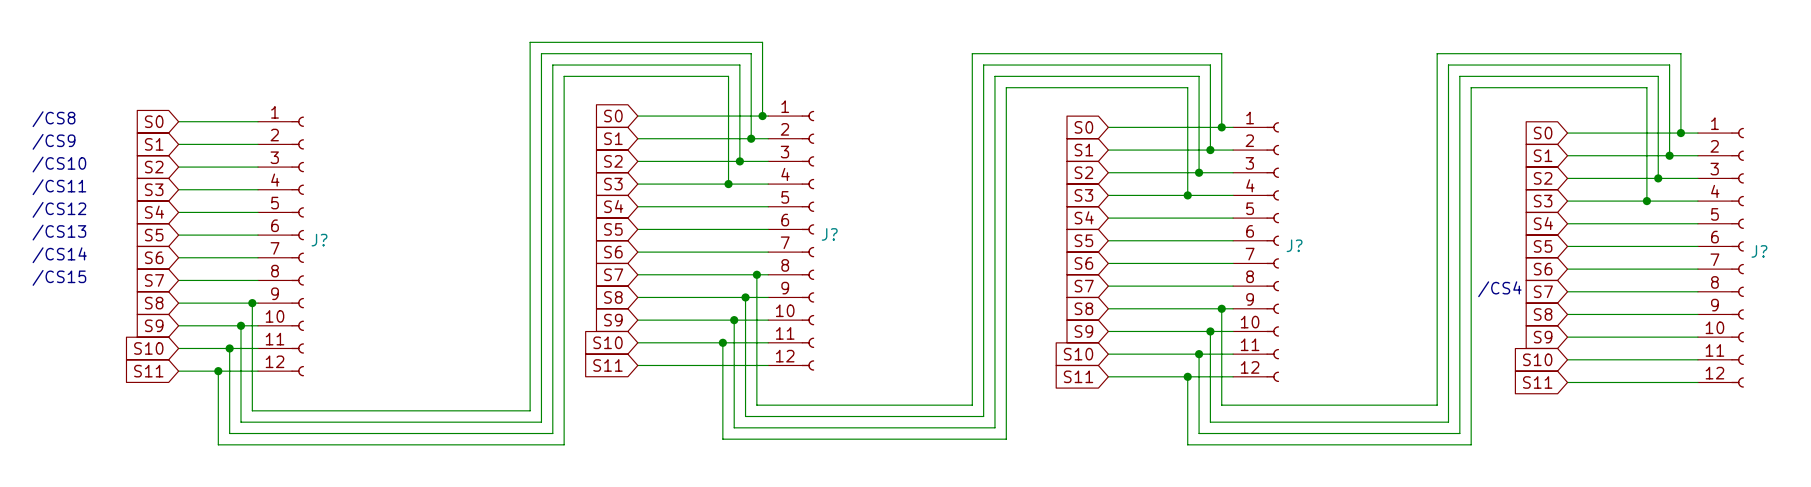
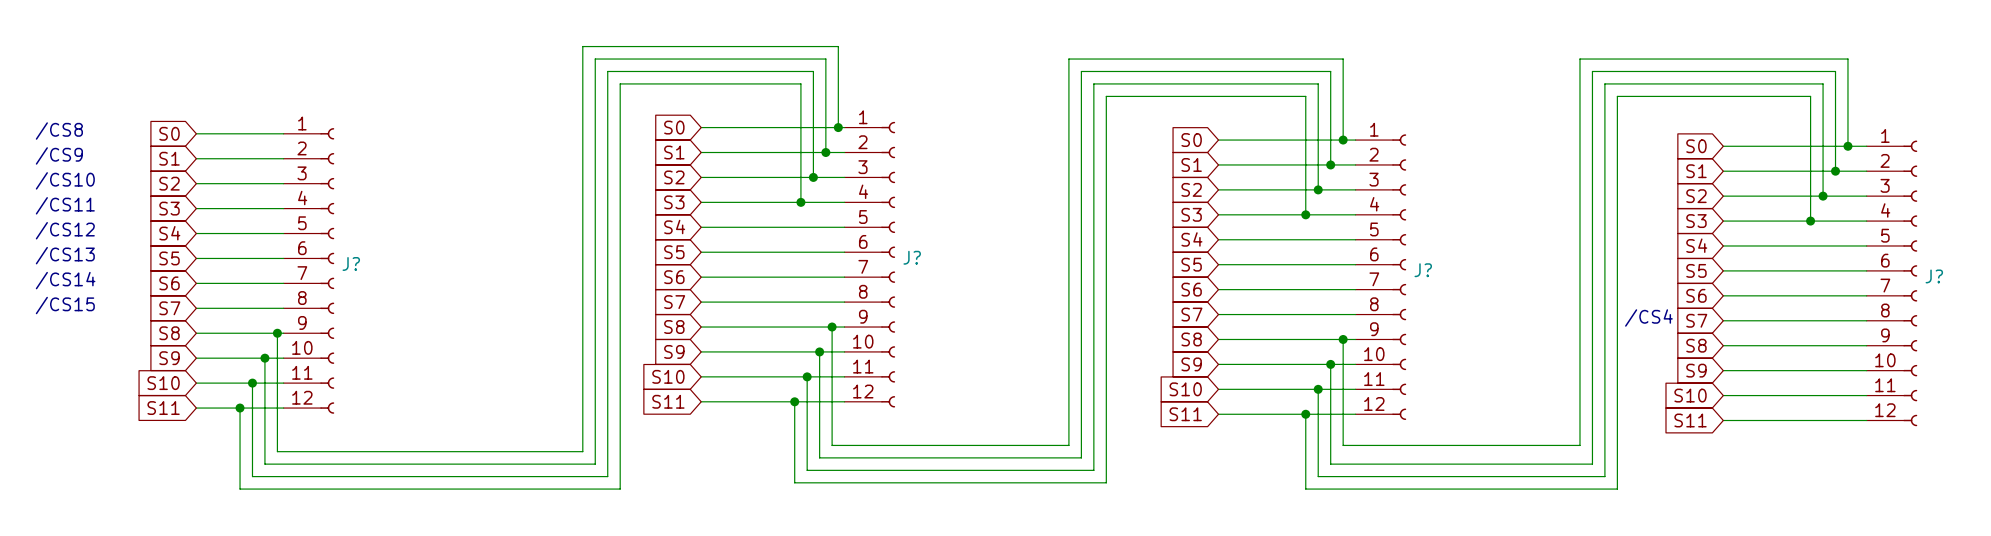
wire: (756, 274) (756, 297) -> none
junction: (756, 274) -> none
wire: (745, 297) (745, 320) -> none
junction: (745, 297) -> none
junction: none -> (832, 327)
wire: (734, 320) (734, 342) -> none
junction: (734, 320) -> none
junction: none -> (819, 351)
wire: (722, 342) (722, 365) -> none
junction: (722, 342) -> none
junction: none -> (807, 376)
junction: none -> (794, 401)

